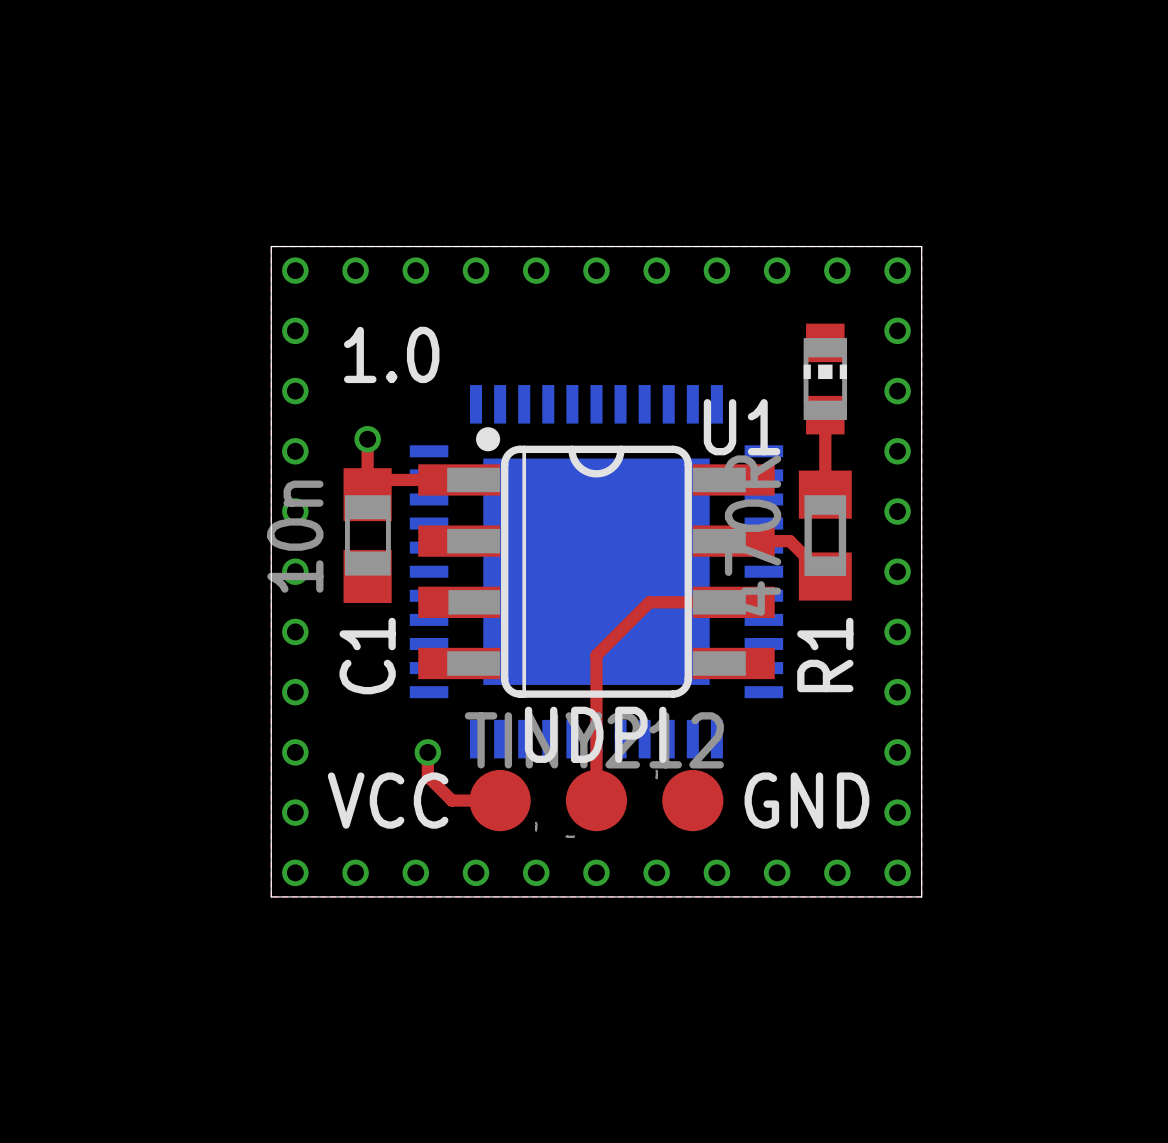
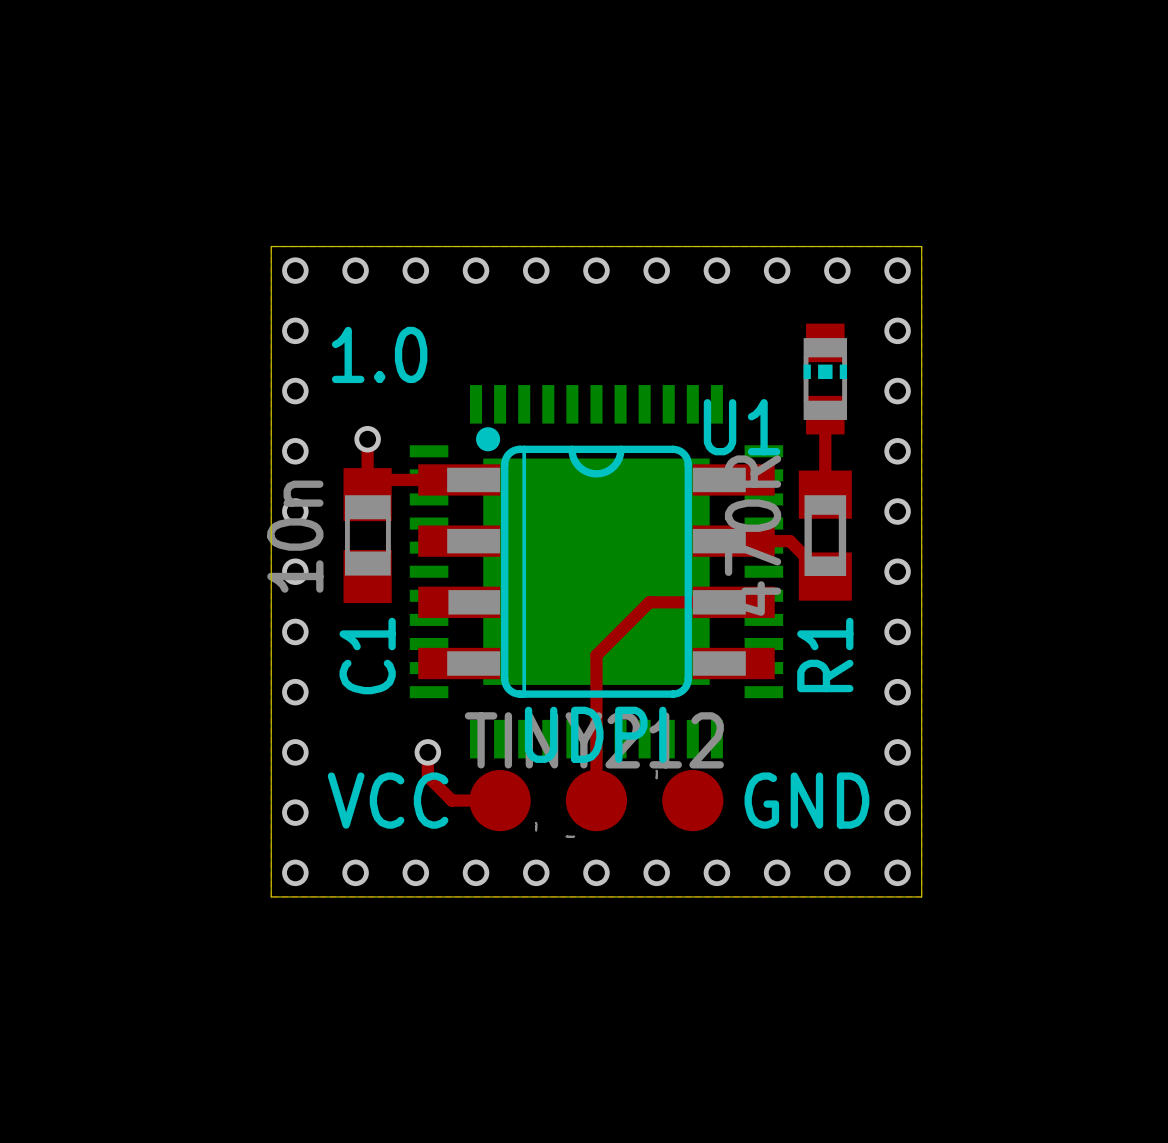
text position: 1.0 (391, 354) -> 1.0 (379, 354)

